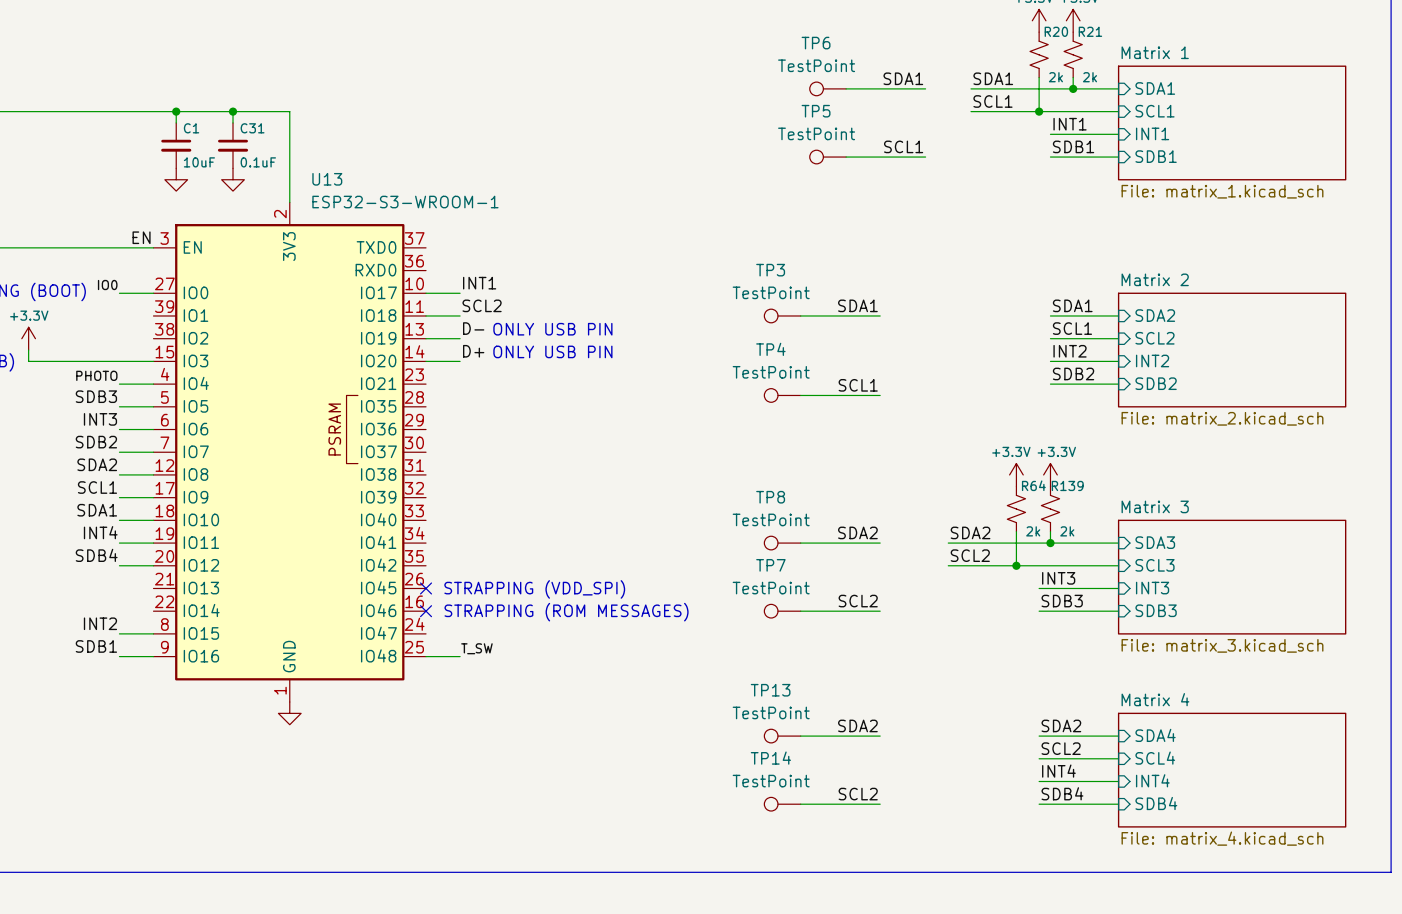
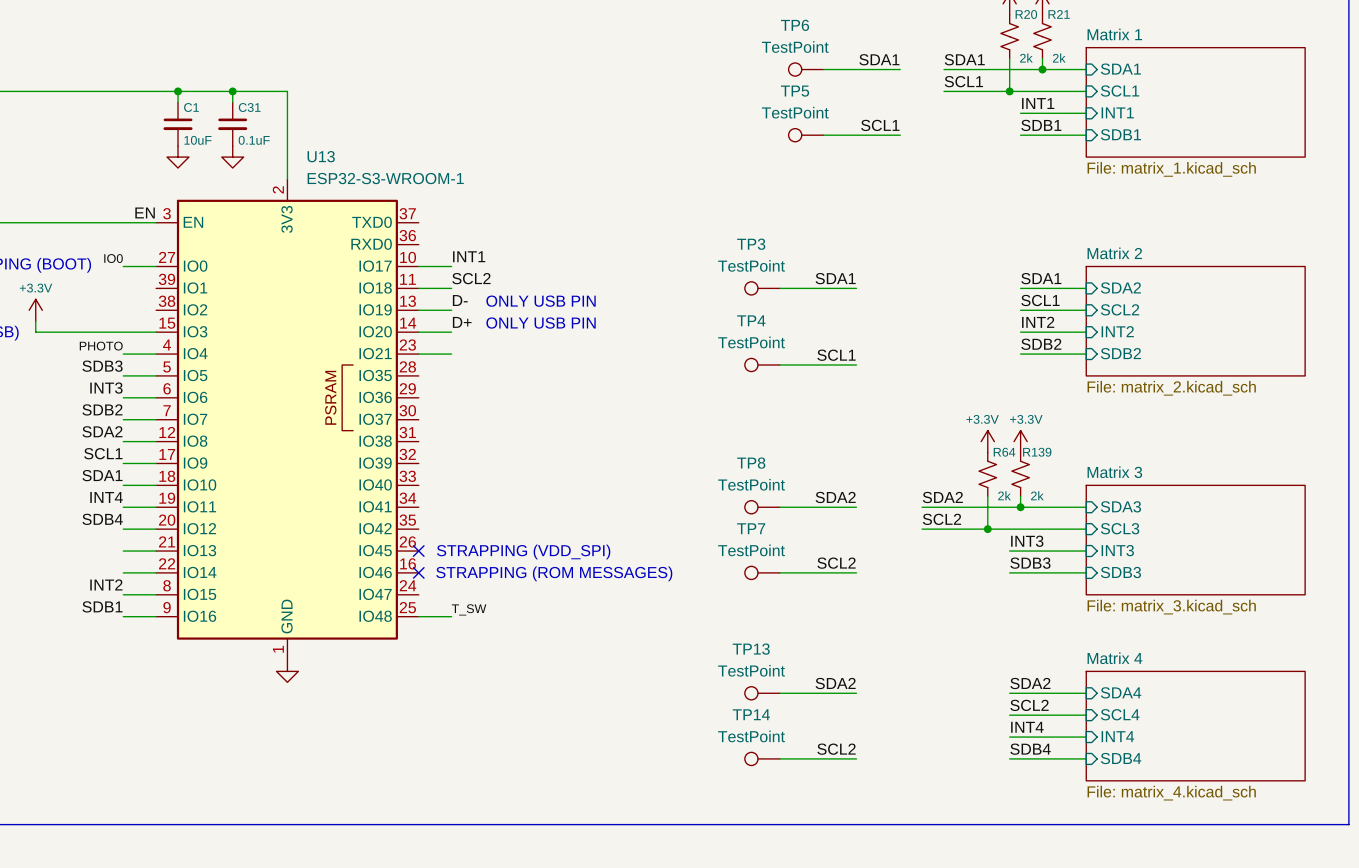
wire: none -> (418, 354) (451, 354)
wire: none -> (123, 551) (156, 551)
wire: none -> (123, 572) (156, 572)

